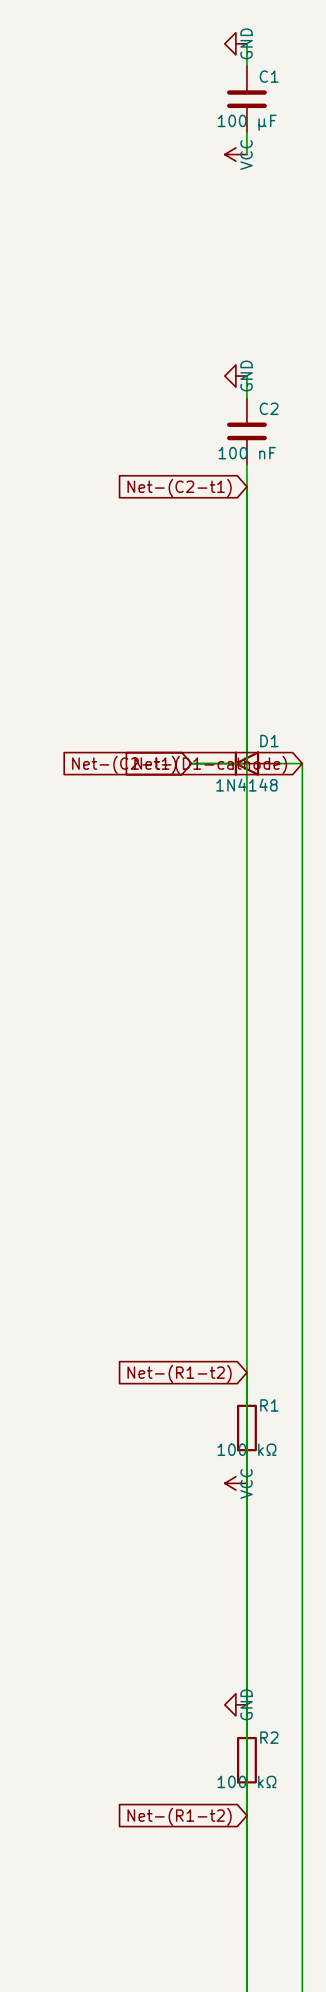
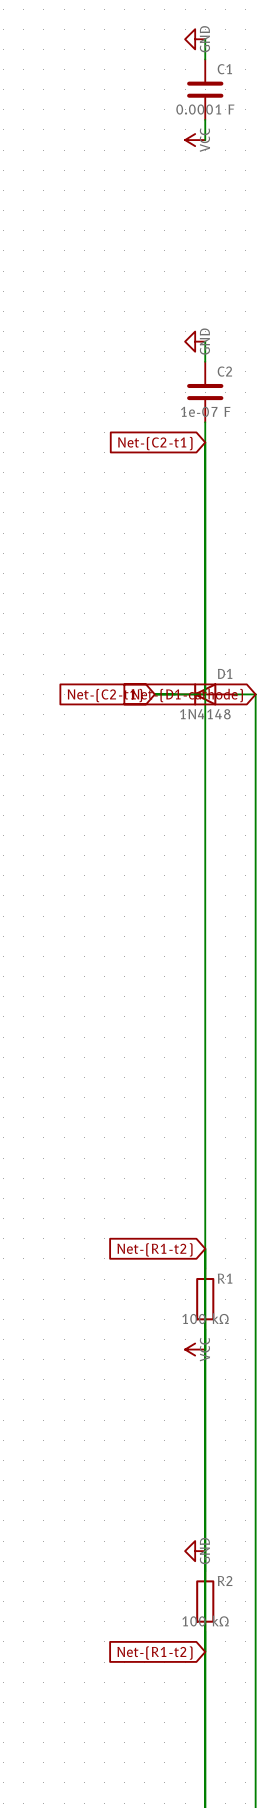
C1 value: 100 µF (247, 122) -> 0.0001 F (205, 109)
C2 value: 100 nF (247, 453) -> 1e-07 F (205, 411)

